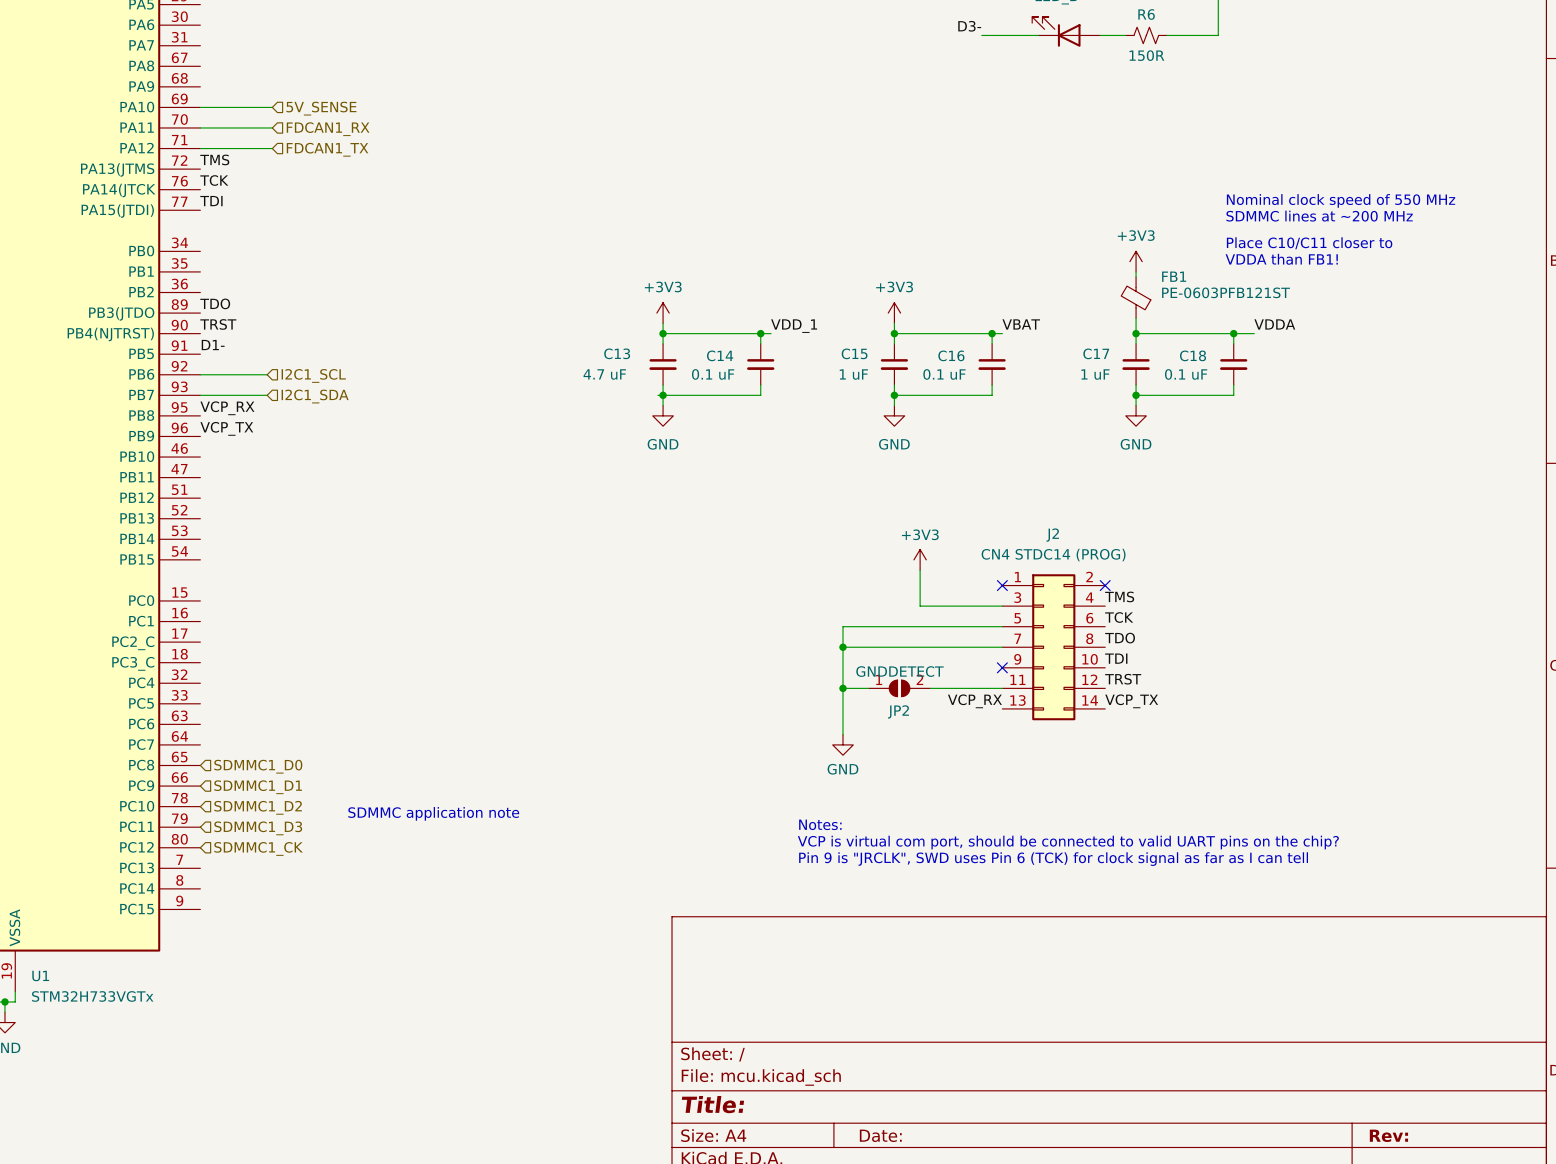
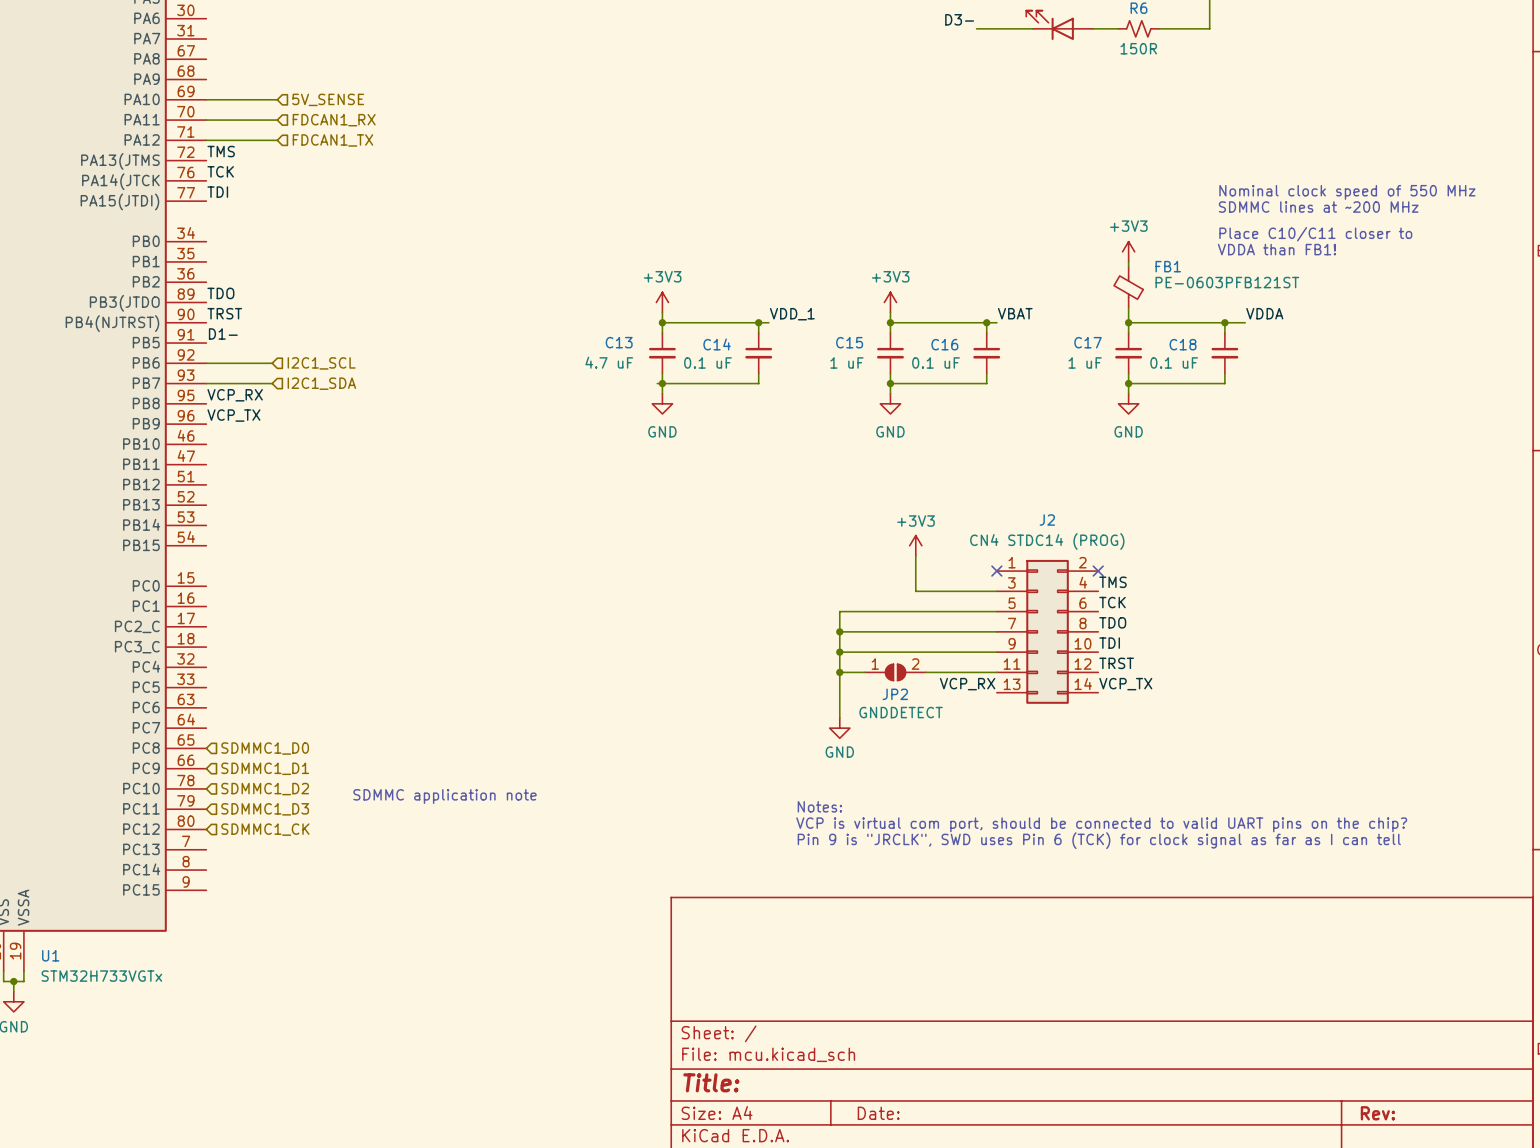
wire: none -> (839, 652) (996, 652)
junction: none -> (839, 652)
no-connect mark: (1002, 667) -> none
JP2 value position: GNDDETECT (899, 671) -> GNDDETECT (901, 712)

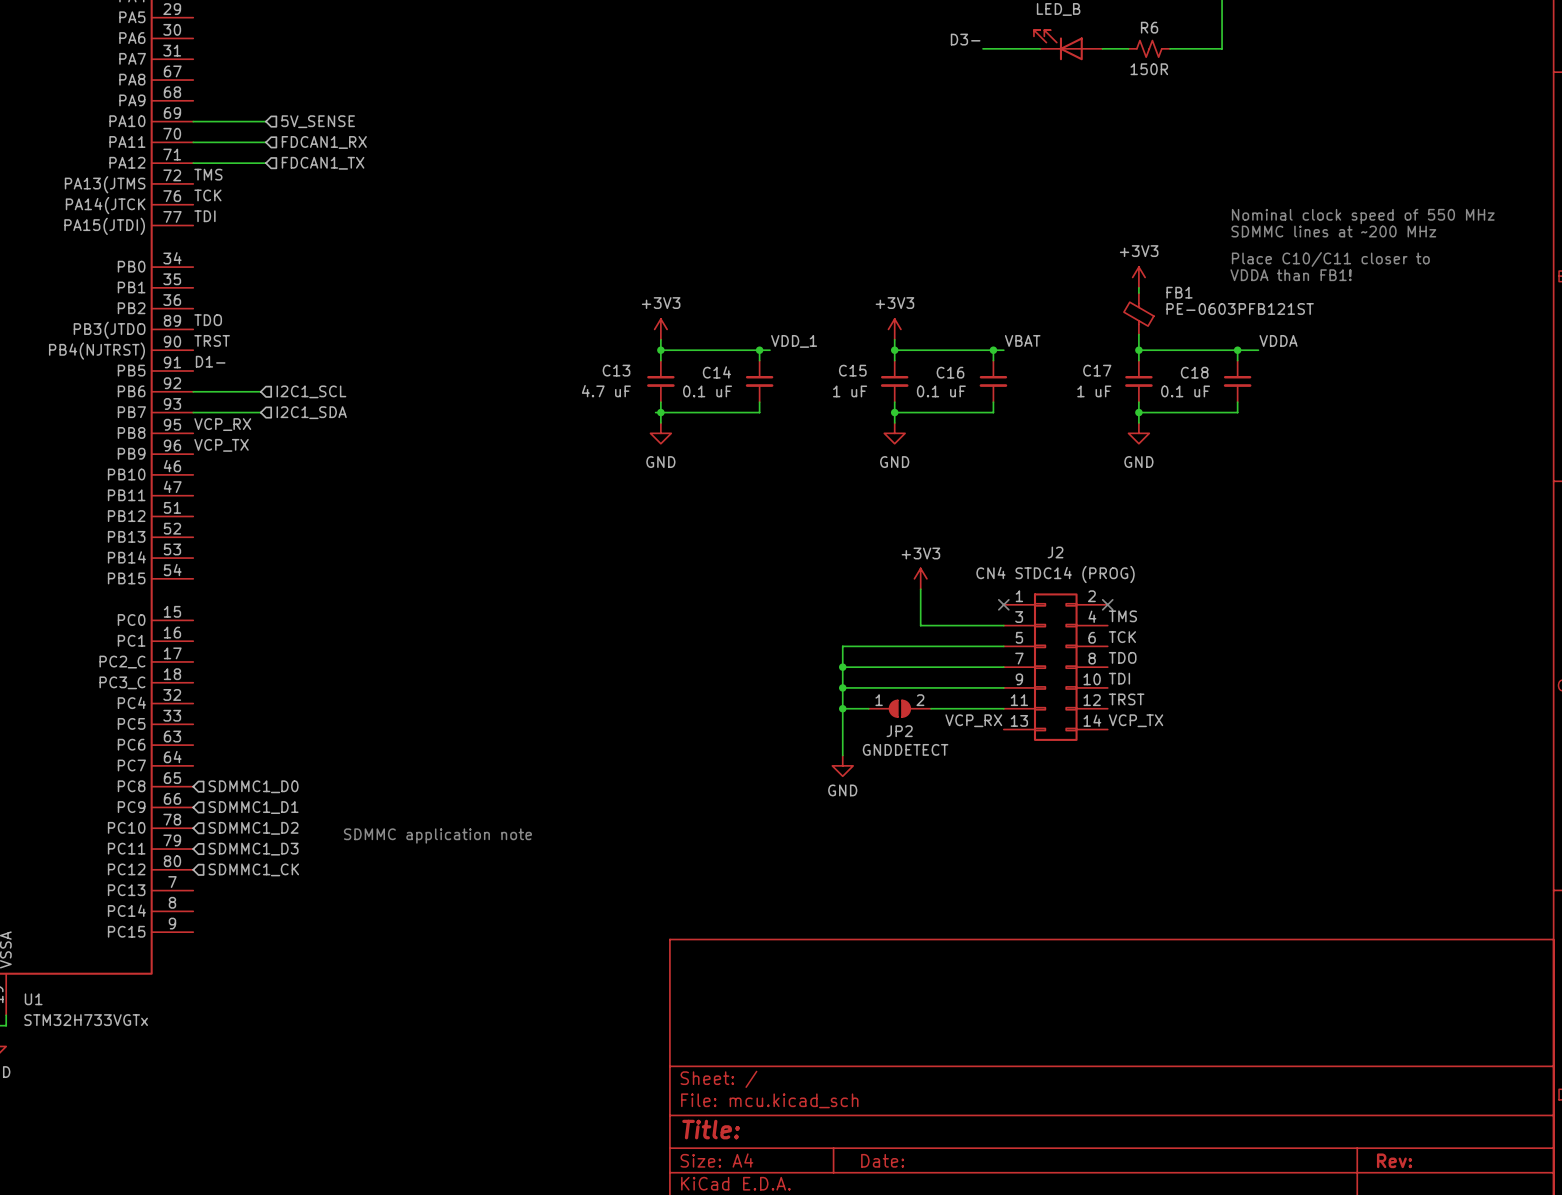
text: Notes: (819, 806) -> none
text: VCP is virtual com port, should be connected to valid UART pins on the chip? (1101, 824) -> none
text: Pin 9 is "JRCLK", SWD uses Pin 6 (TCK) for clock signal as far as I can tell (1099, 840) -> none

